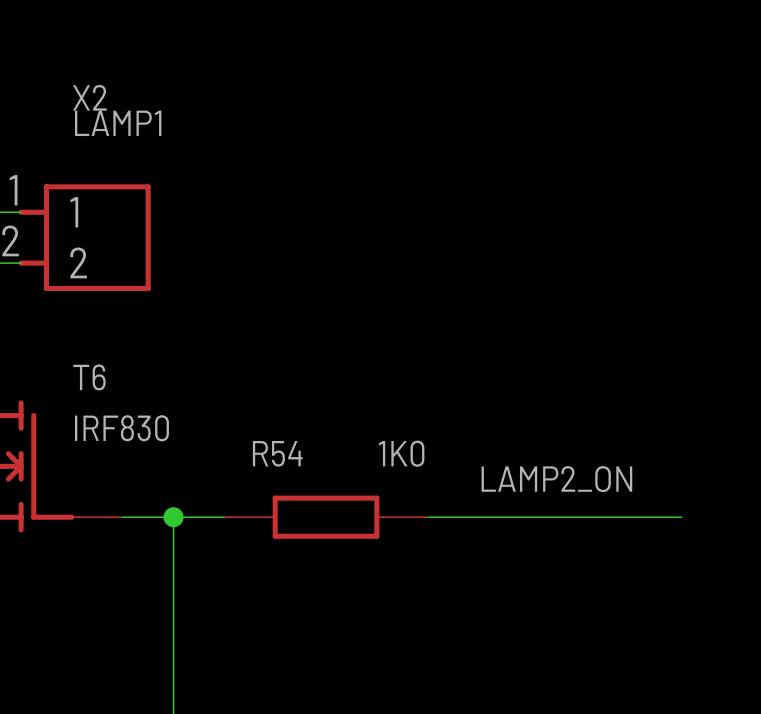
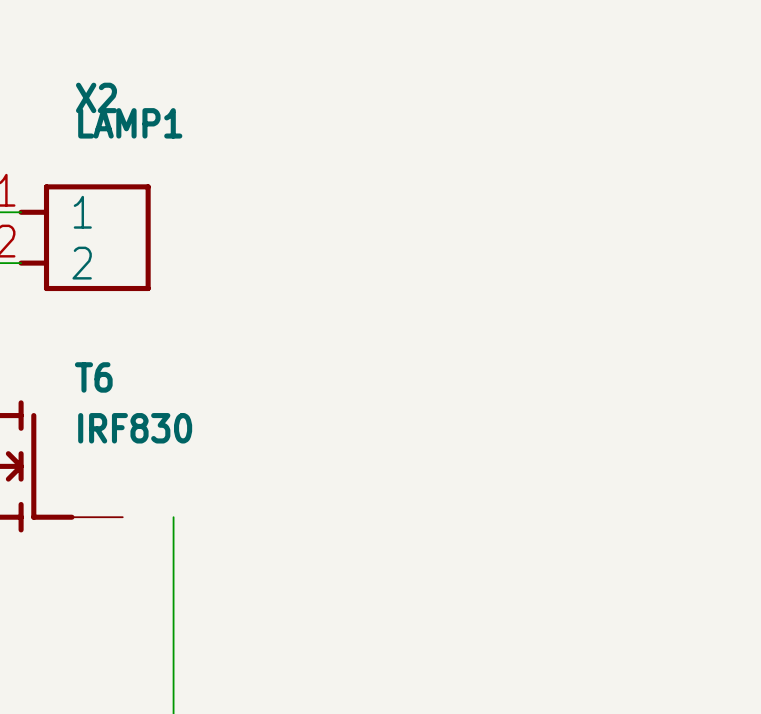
label: LAMP2_ON (556, 479) -> none
wire: (122, 517) (224, 517) -> none
junction: (173, 517) -> none
R54: 1K0 (326, 517) -> none
wire: (427, 517) (681, 517) -> none

